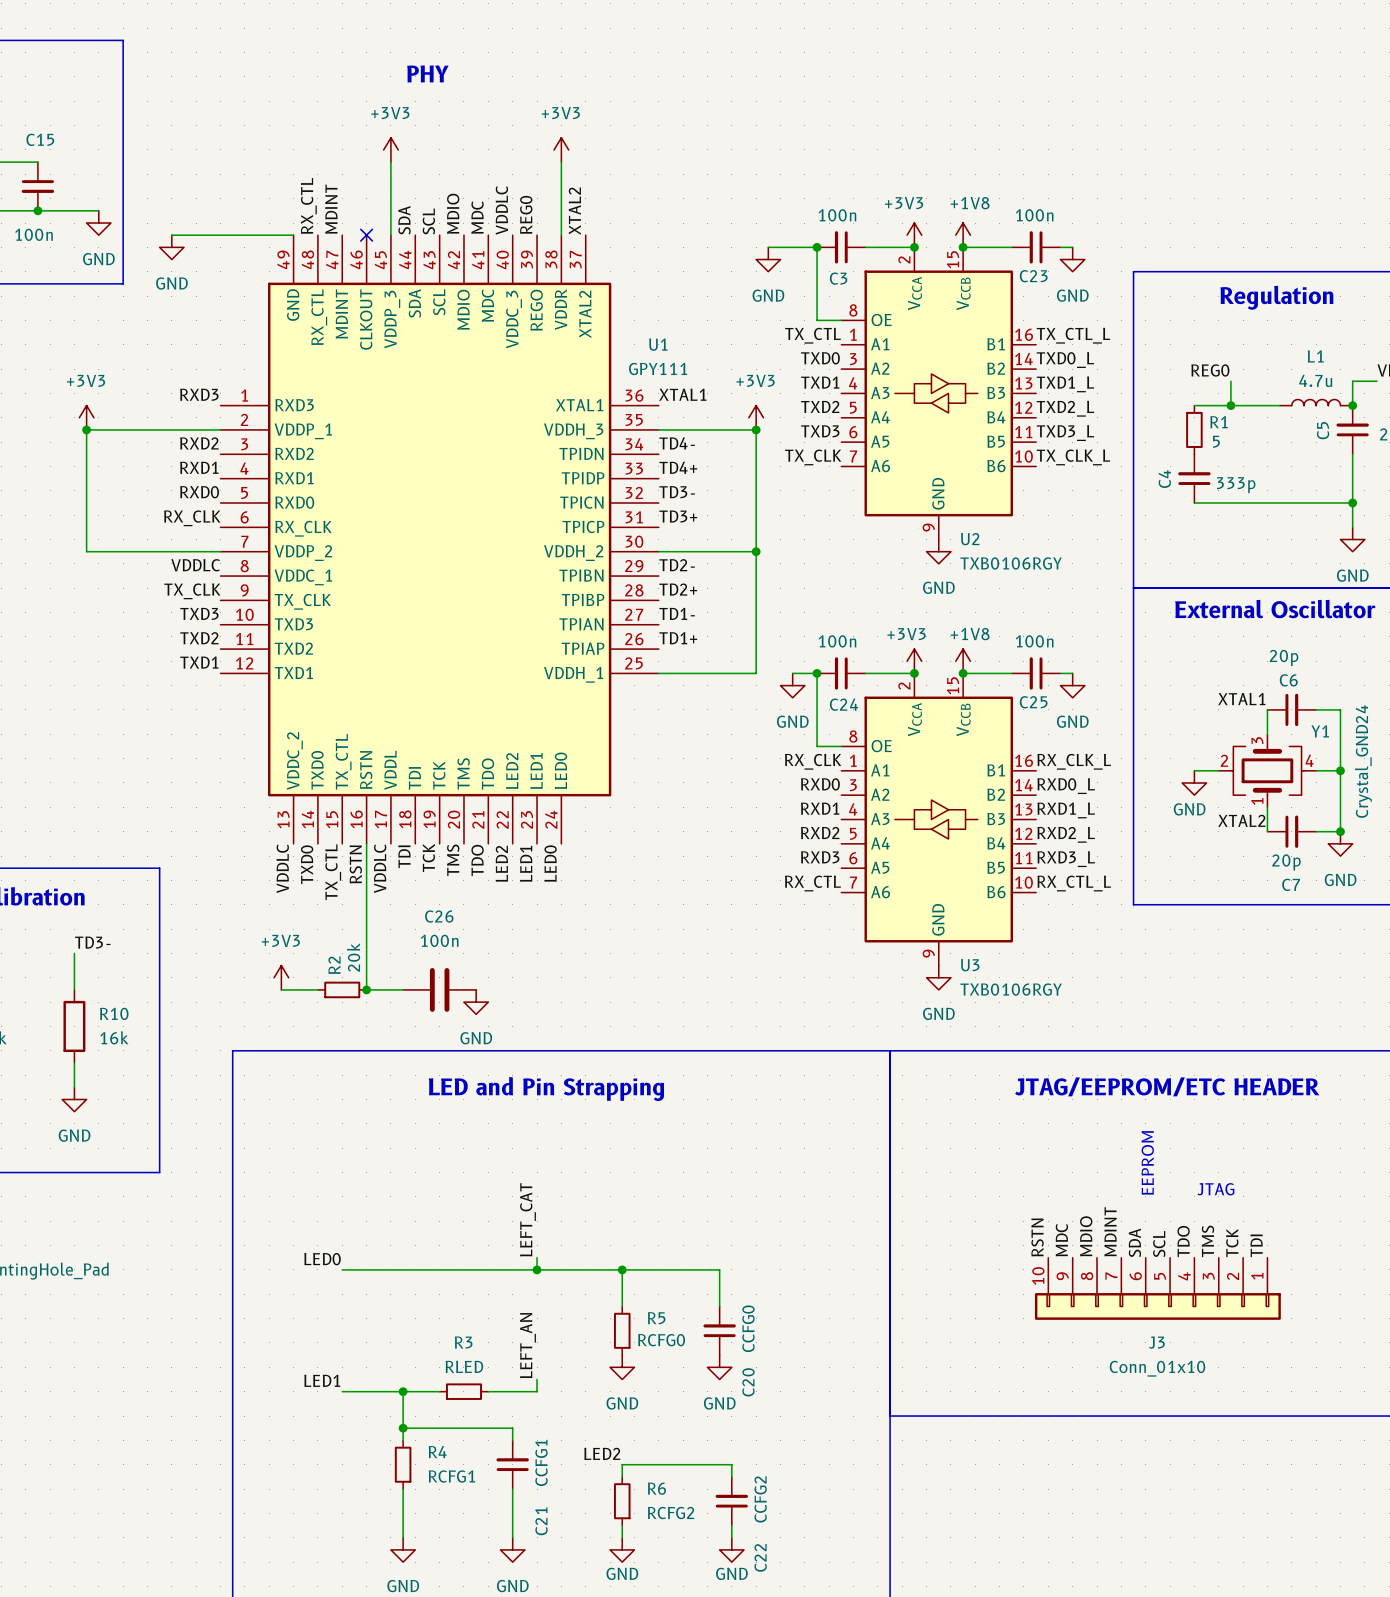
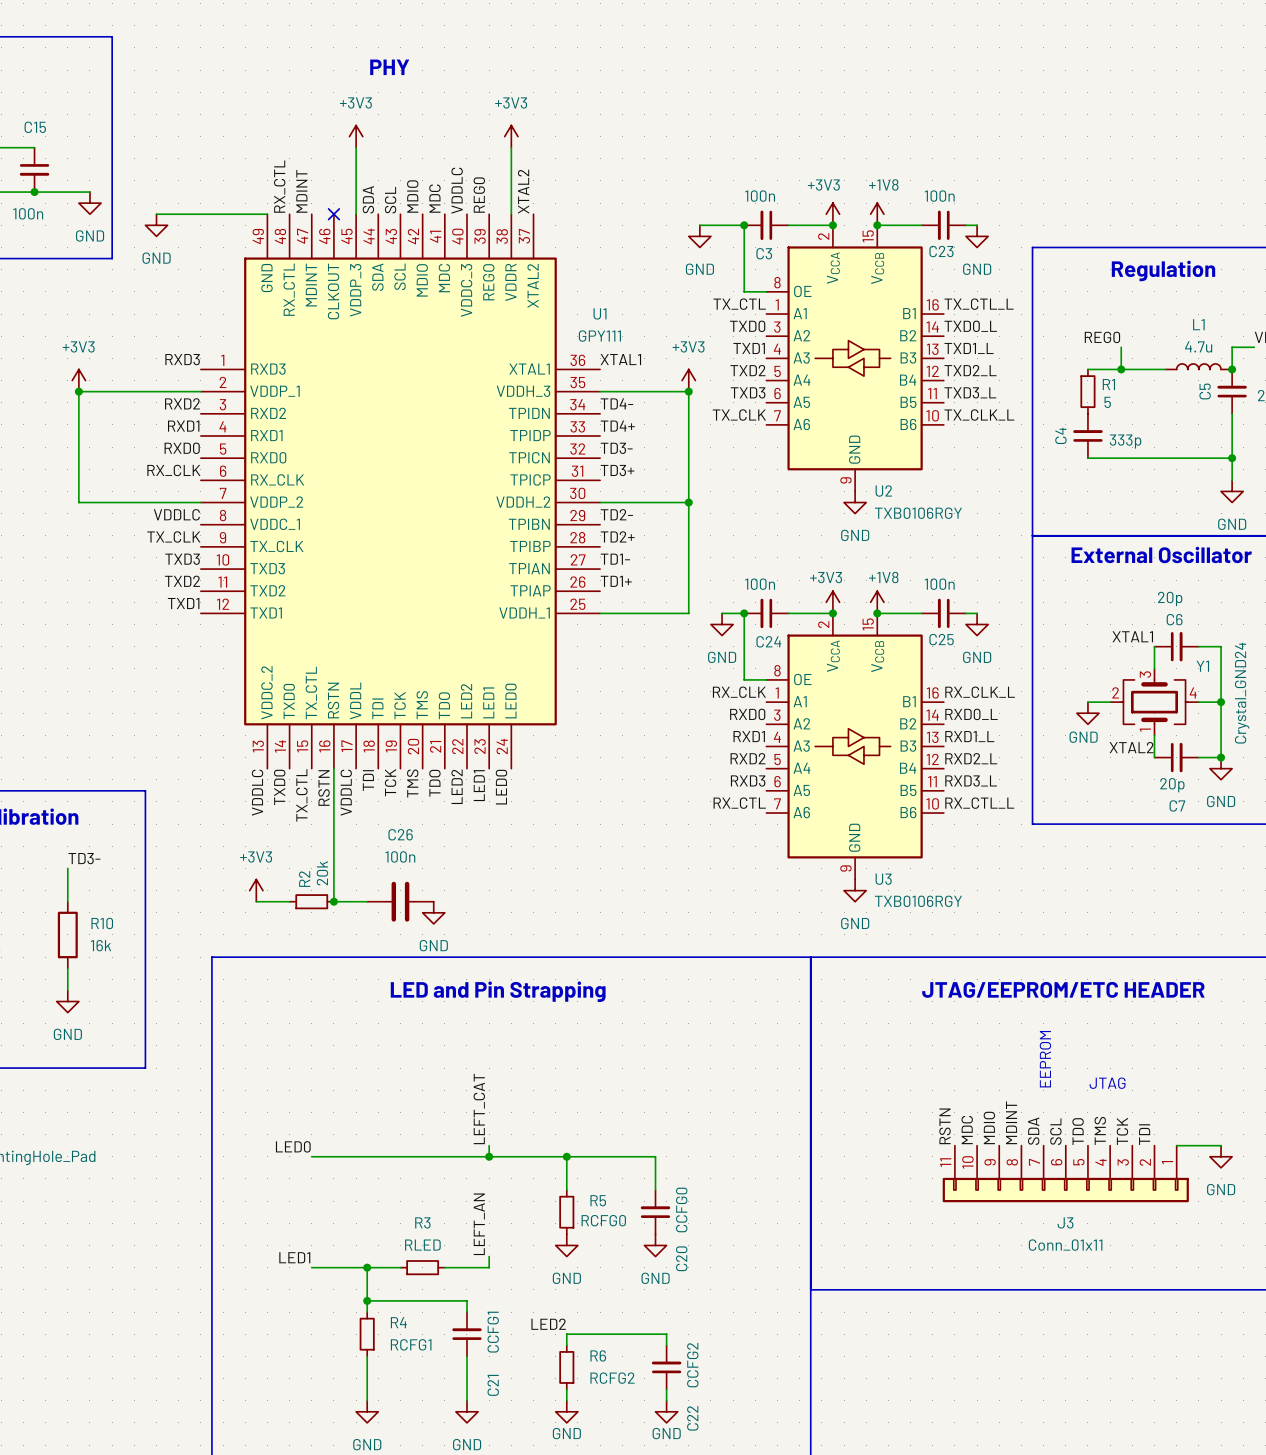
J3 symbol: [1034, 1257, 1281, 1320] -> [942, 1145, 1189, 1203]
wire: none -> (1176, 1145) (1221, 1145)
power symbol: none -> GND (1221, 1156)
J3 value: Conn_01x10 (1157, 1368) -> Conn_01x11 (1065, 1245)

